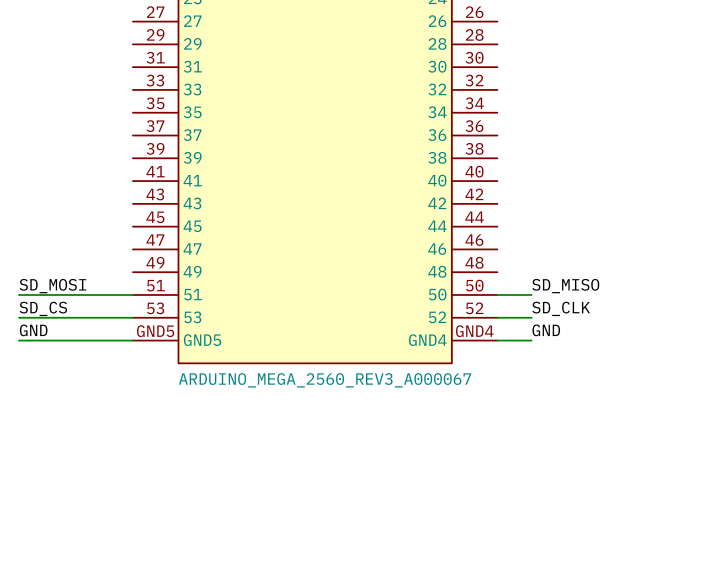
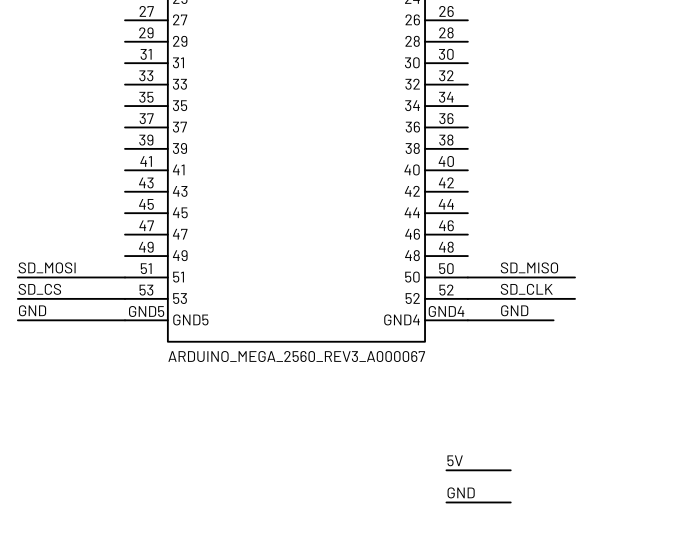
wire: none -> (500, 277) (575, 277)
wire: none -> (500, 298) (575, 298)
wire: none -> (500, 320) (553, 320)
label: none -> 5V (455, 460)
wire: none -> (446, 470) (510, 470)
label: none -> GND (461, 492)
wire: none -> (446, 502) (510, 502)

